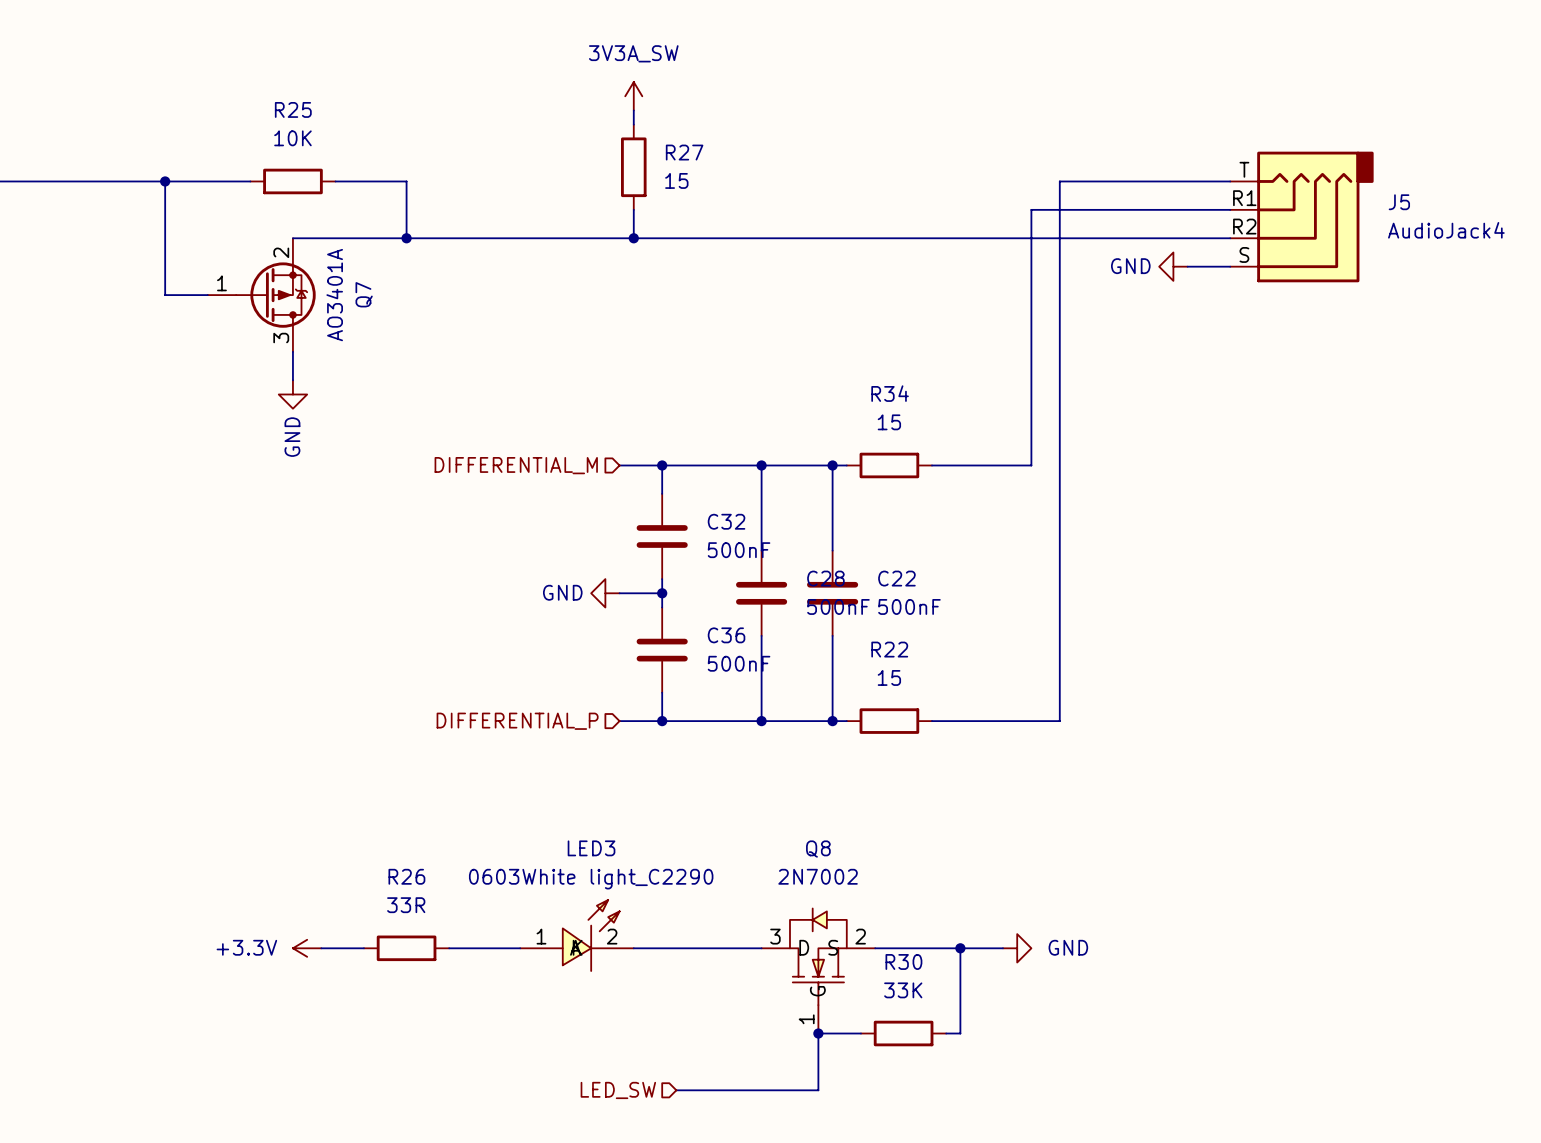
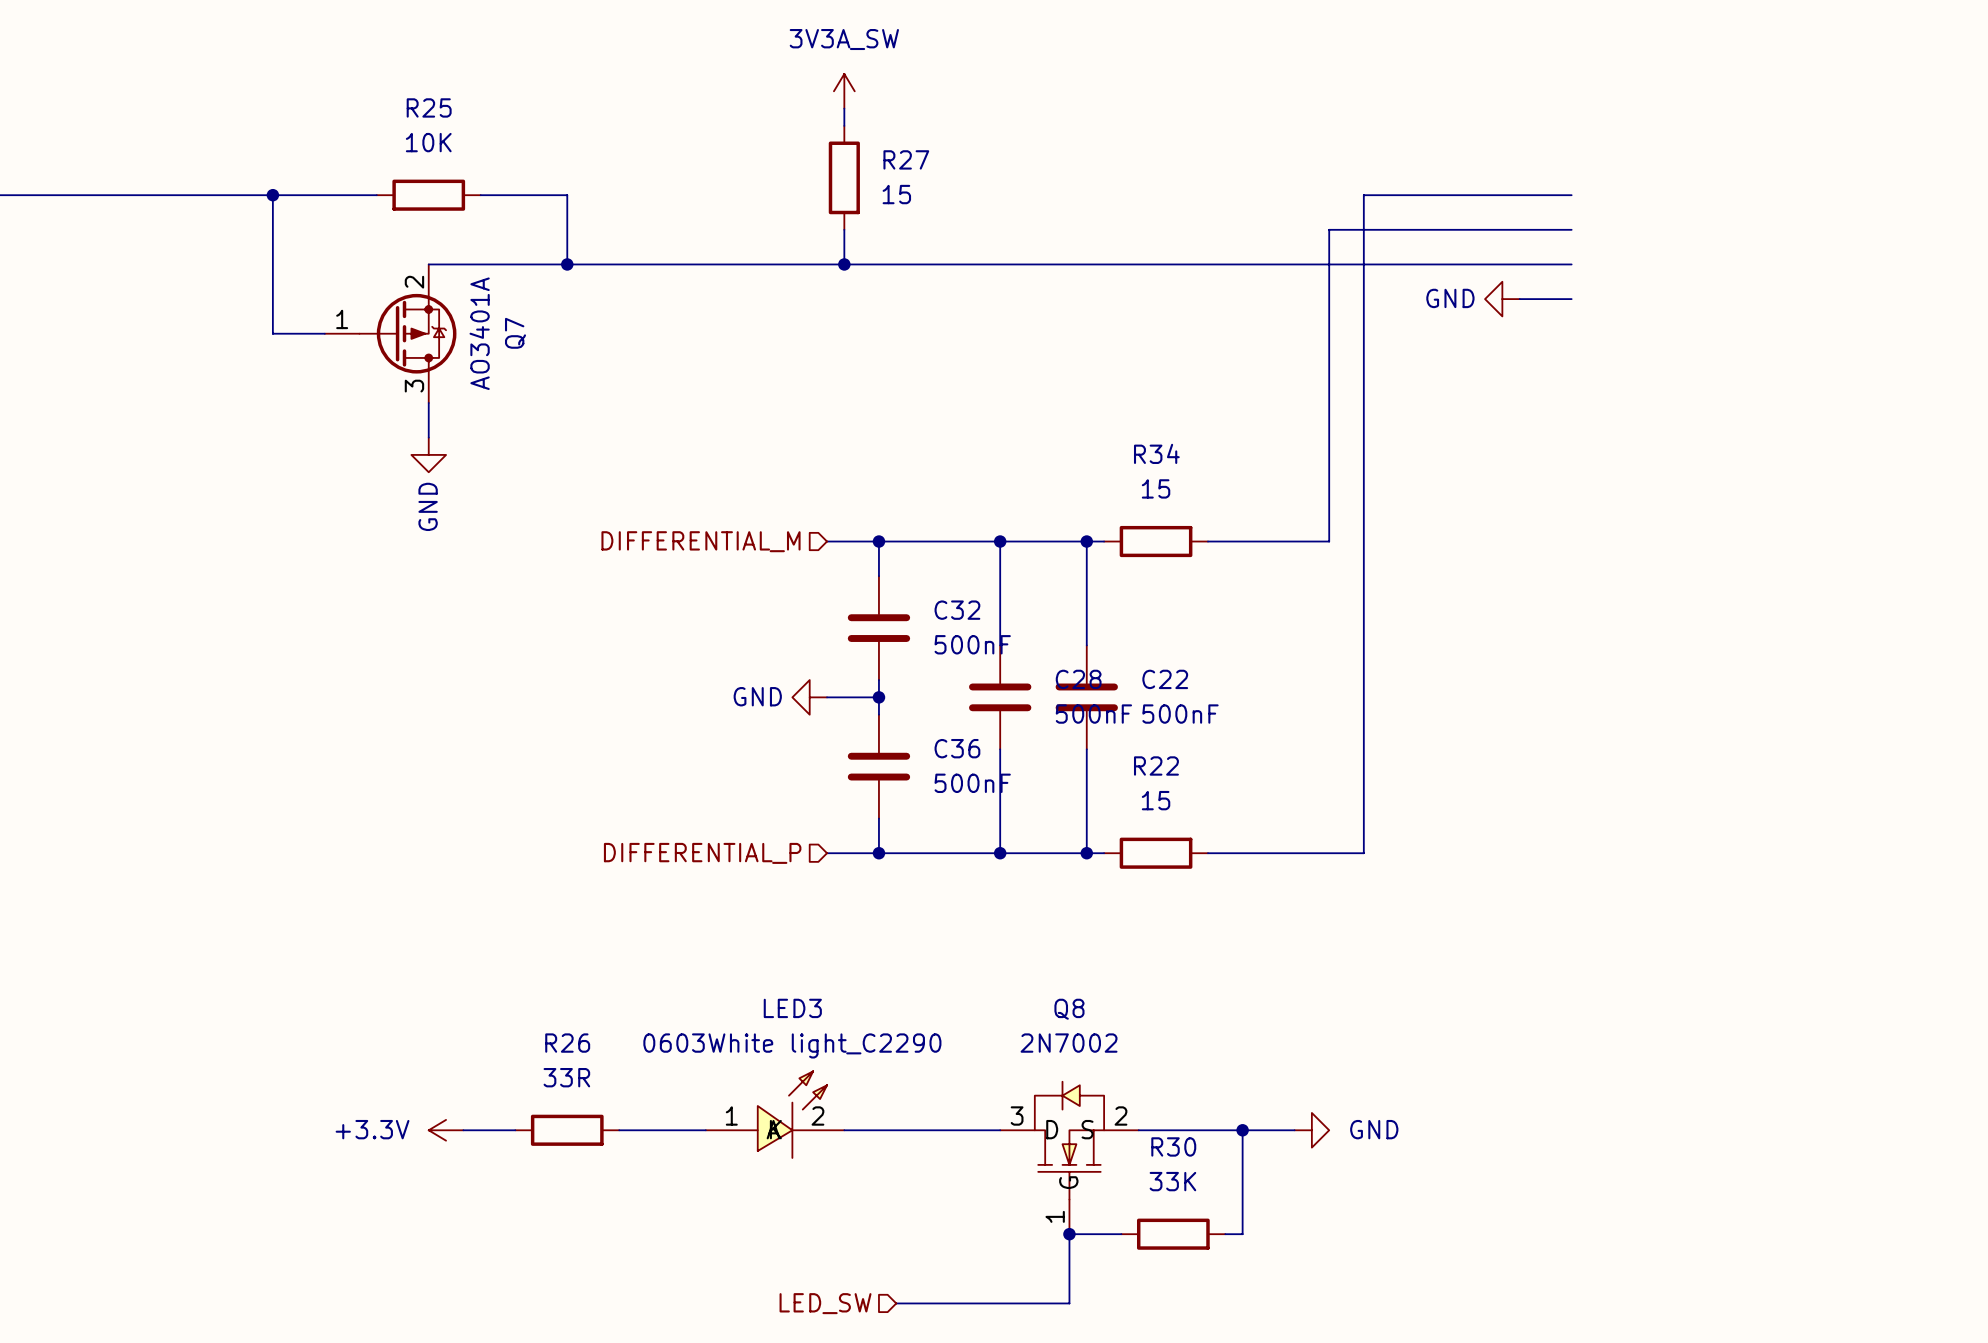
J5: AudioJack4 (1301, 216) -> none

